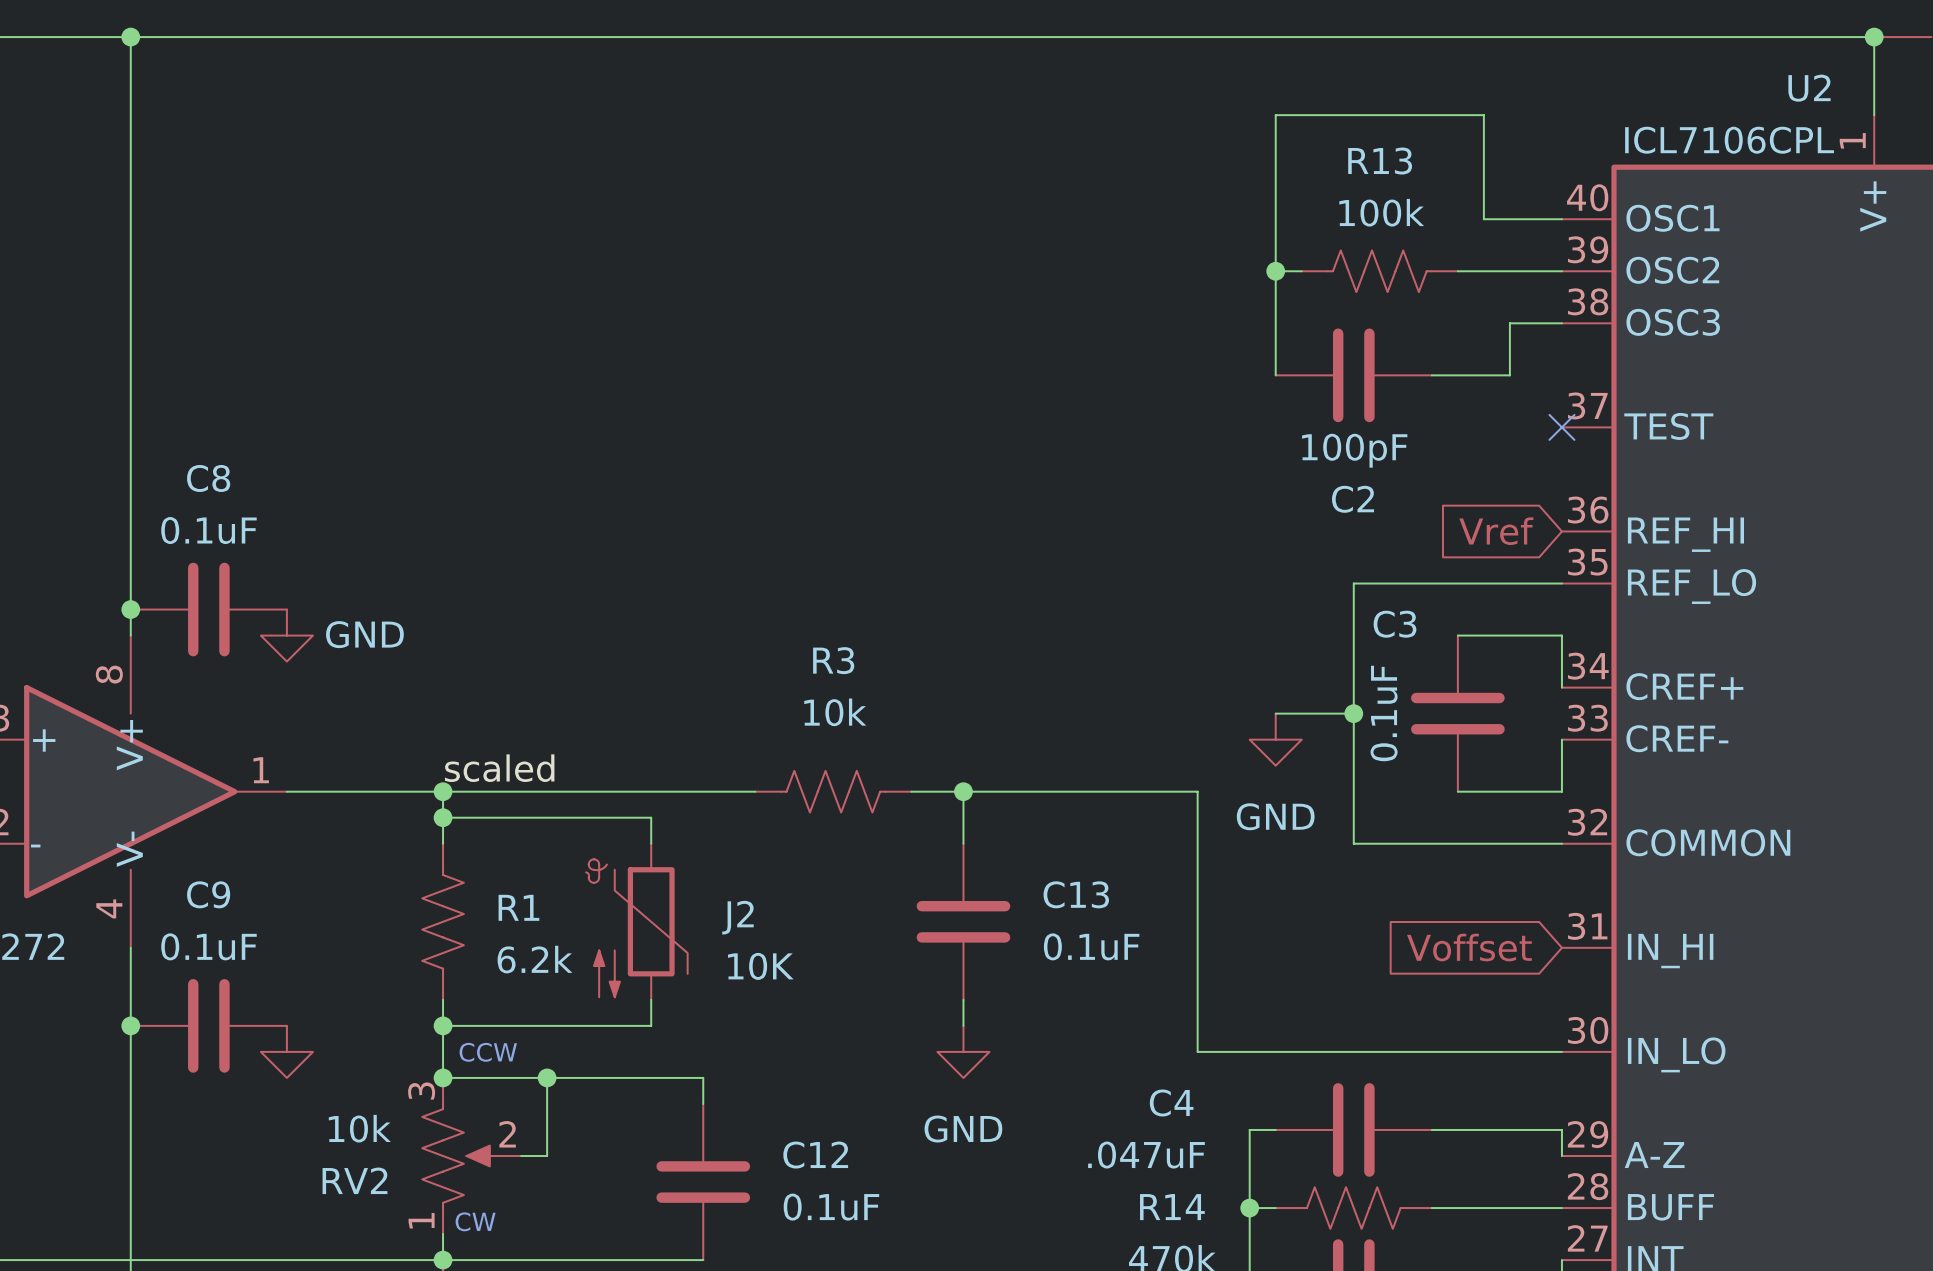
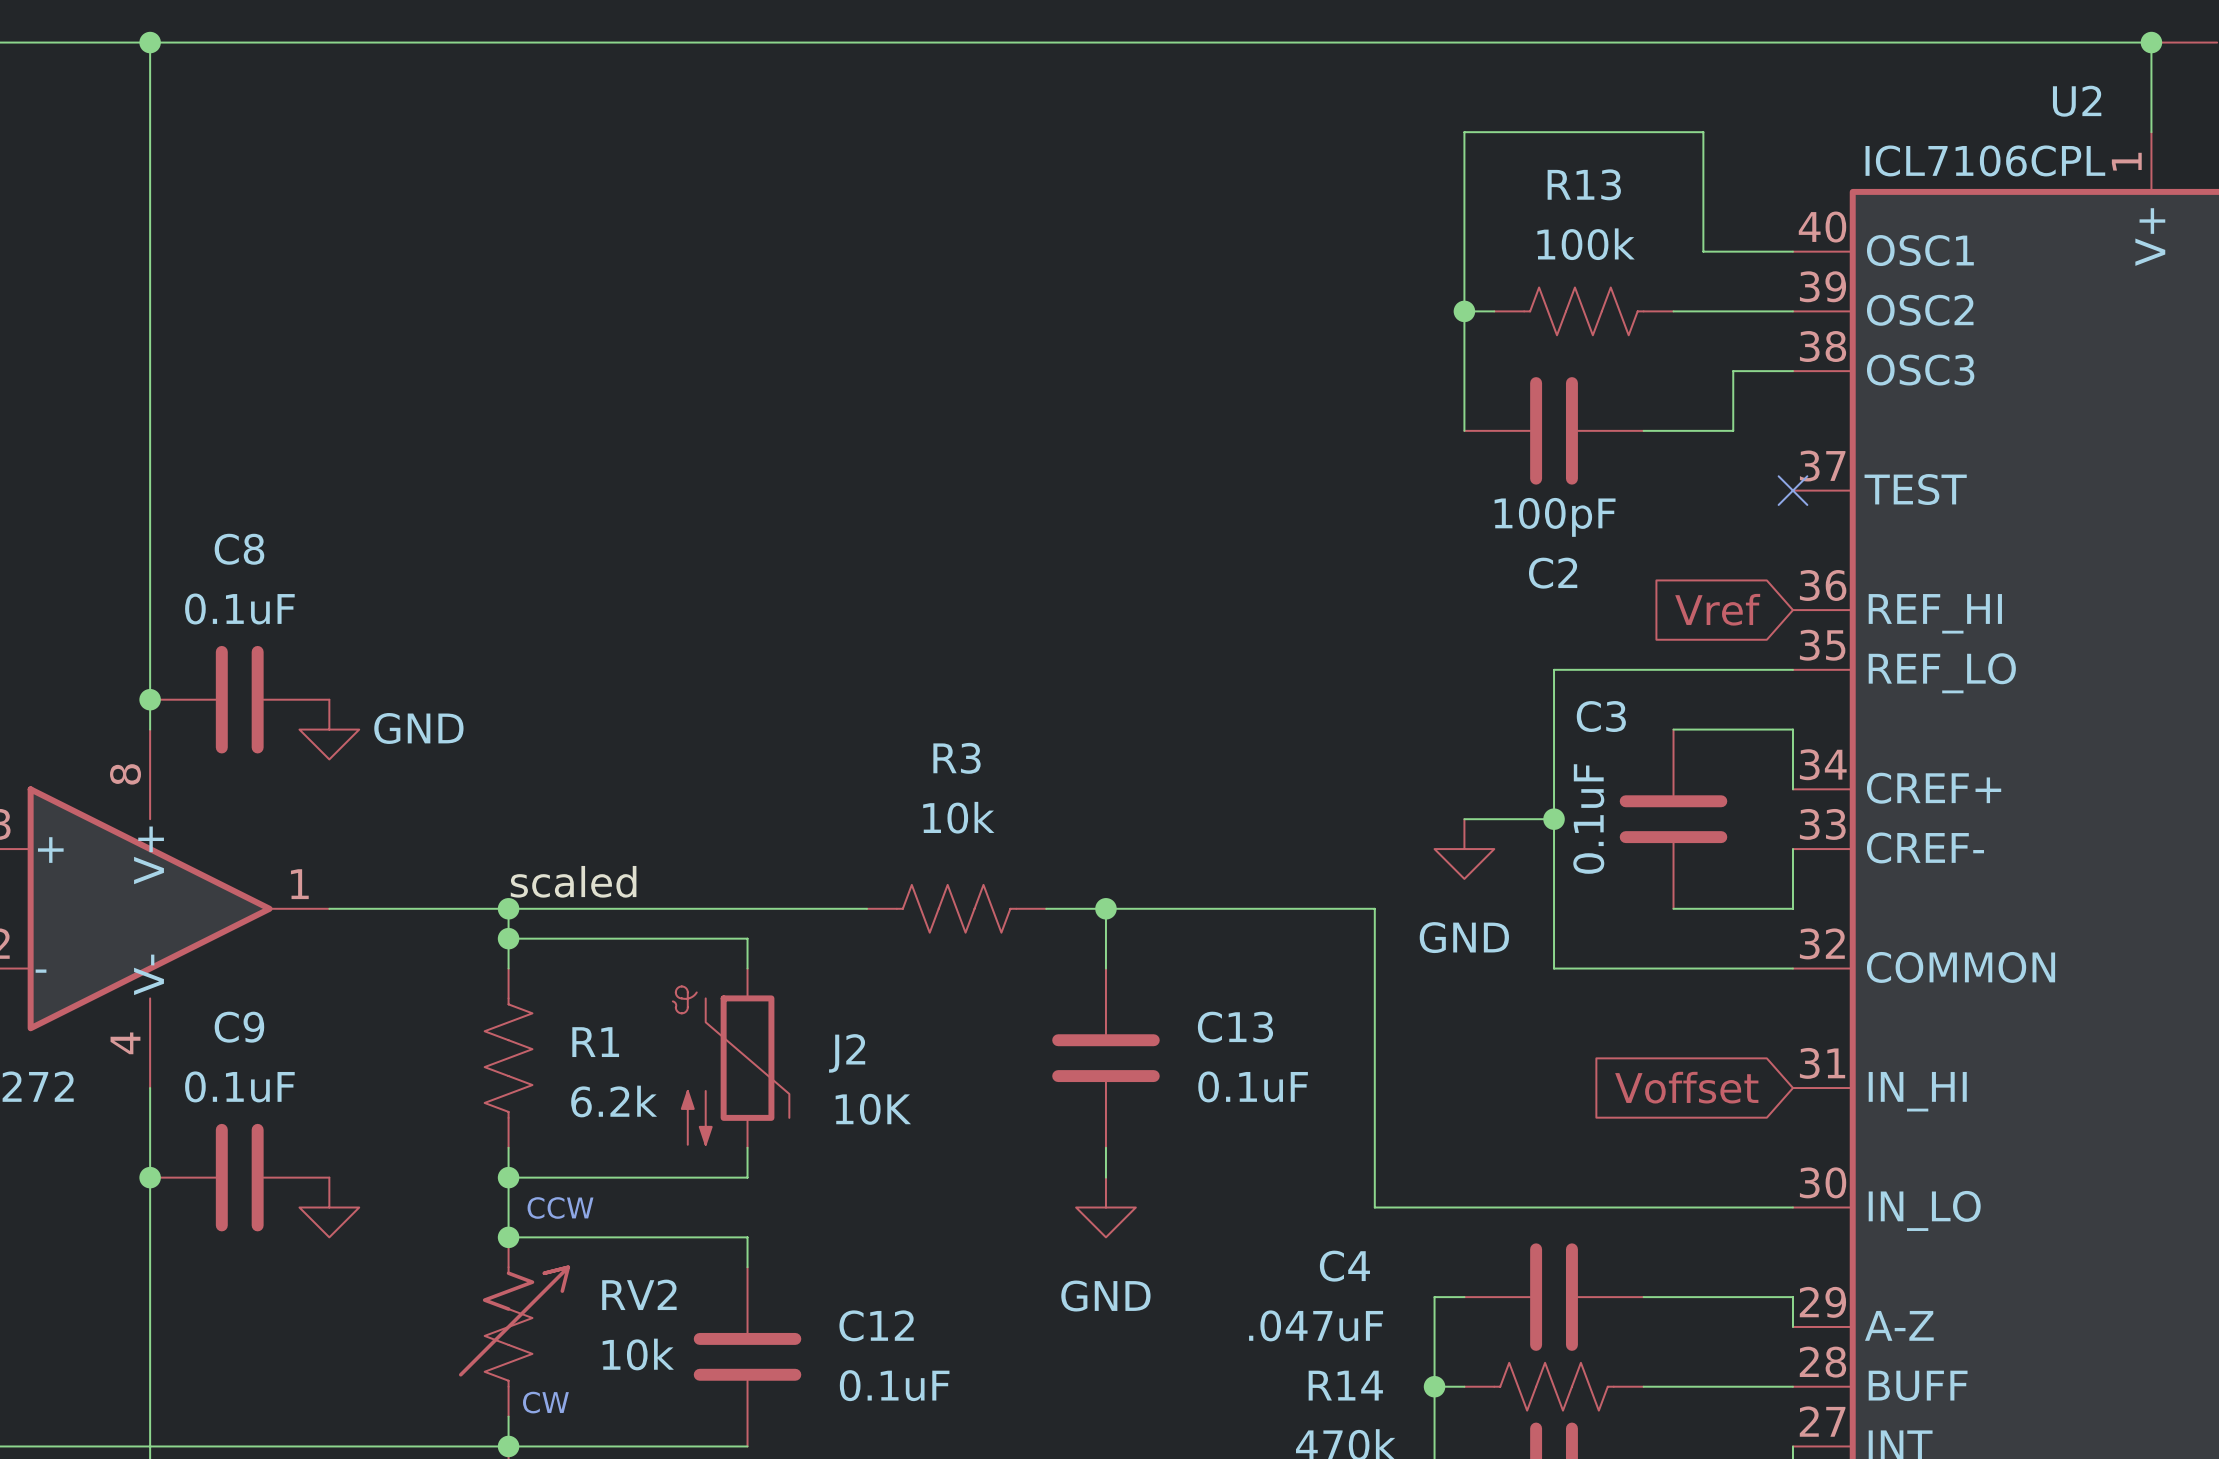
RV2 symbol: [422, 1077, 522, 1235] -> [458, 1237, 571, 1417]
wire: (547, 1077) (547, 1156) (521, 1156) -> none
junction: (547, 1077) -> none
wire: (651, 1077) (703, 1077) (703, 1103) -> (747, 1237) (747, 1267)
RV2 value position: 10k (359, 1128) -> 10k (638, 1354)
RV2 name position: RV2 (354, 1180) -> RV2 (639, 1294)
C12 position: (703, 1182) -> (747, 1356)
wire: (651, 1260) (703, 1260) -> none

